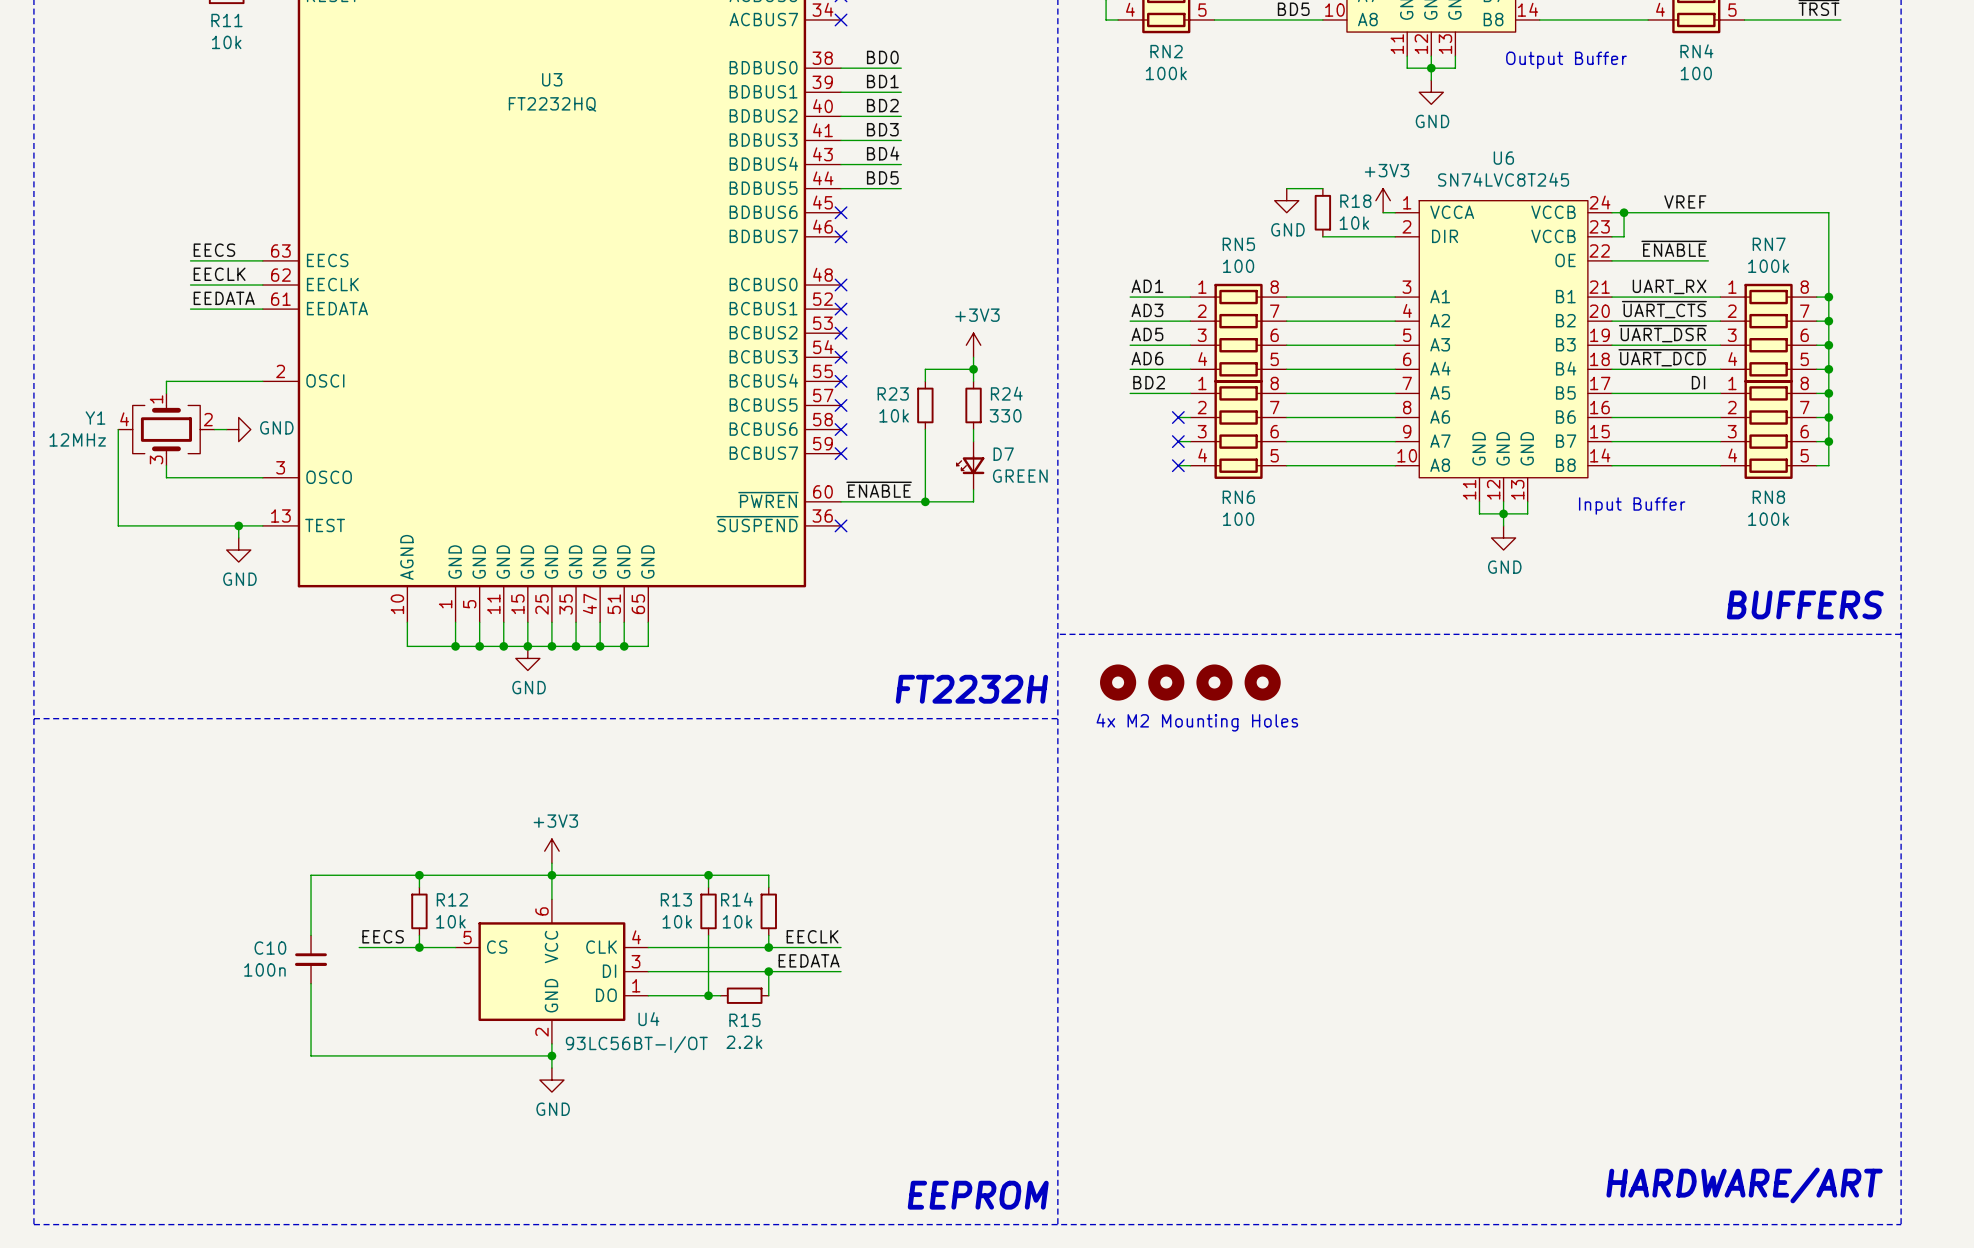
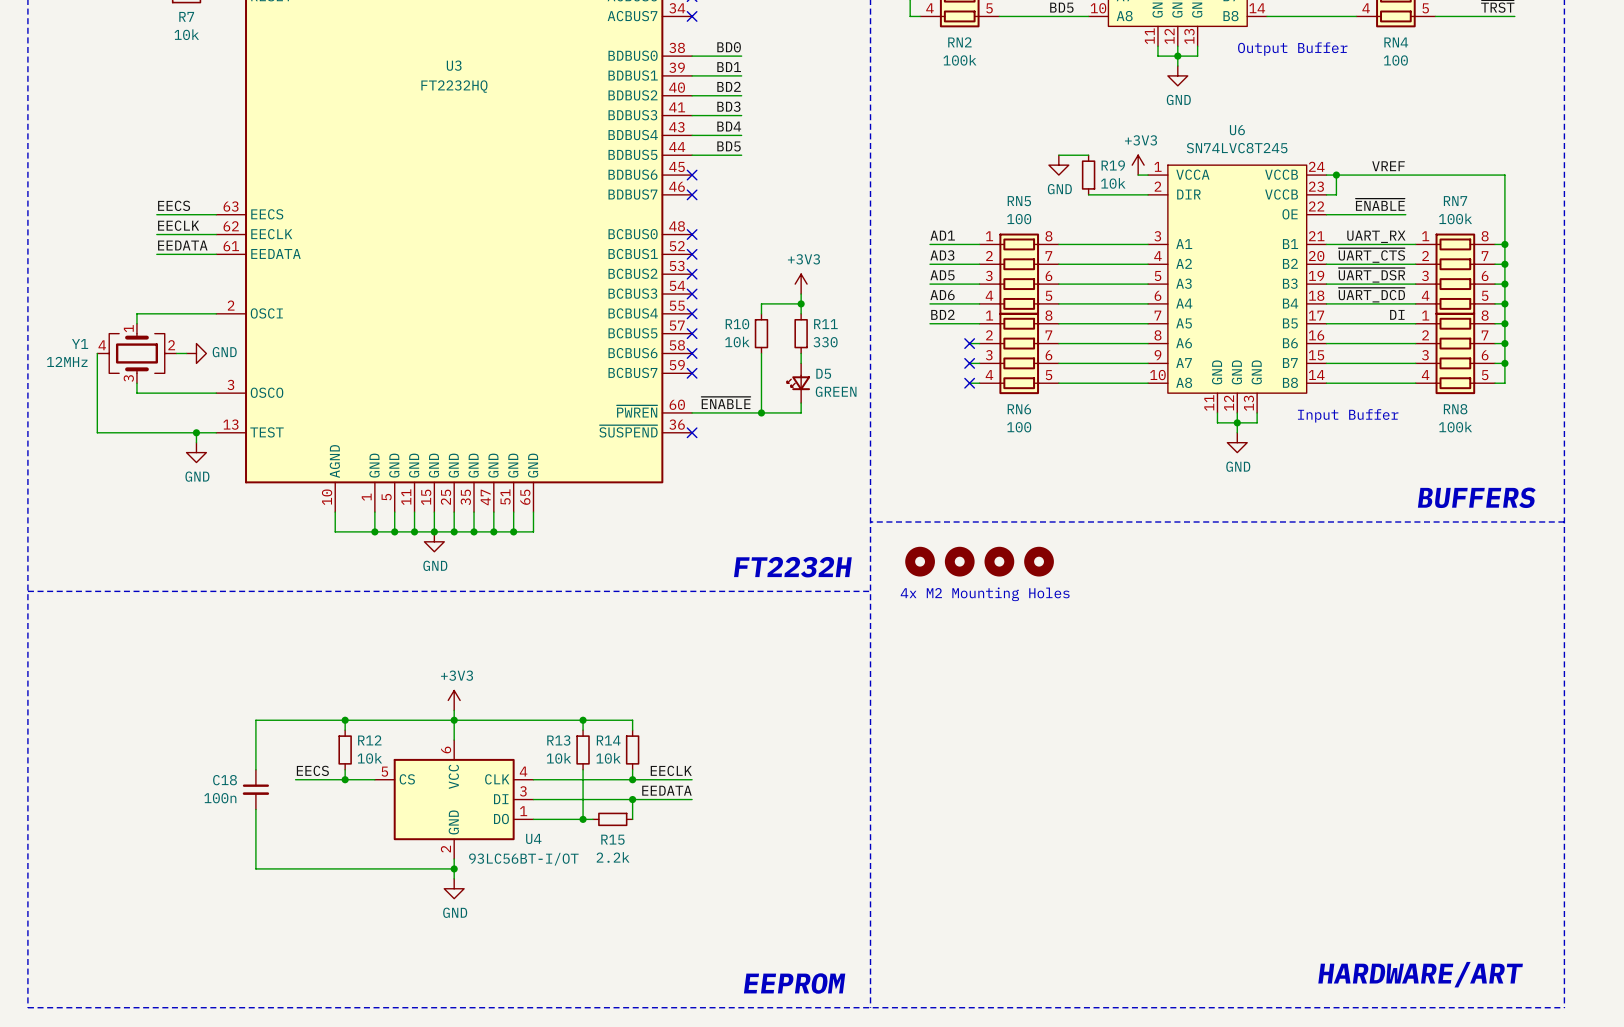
R11 name: R11 (226, 20) -> R7 (186, 16)
R18 name: R18 (1355, 201) -> R19 (1113, 165)
R23 name: R23 (893, 393) -> R10 (737, 324)
R24 name: R24 (1006, 393) -> R11 (825, 324)
D7 name: D7 (1003, 454) -> D5 (823, 373)
C10 name: C10 (270, 948) -> C18 (225, 780)

